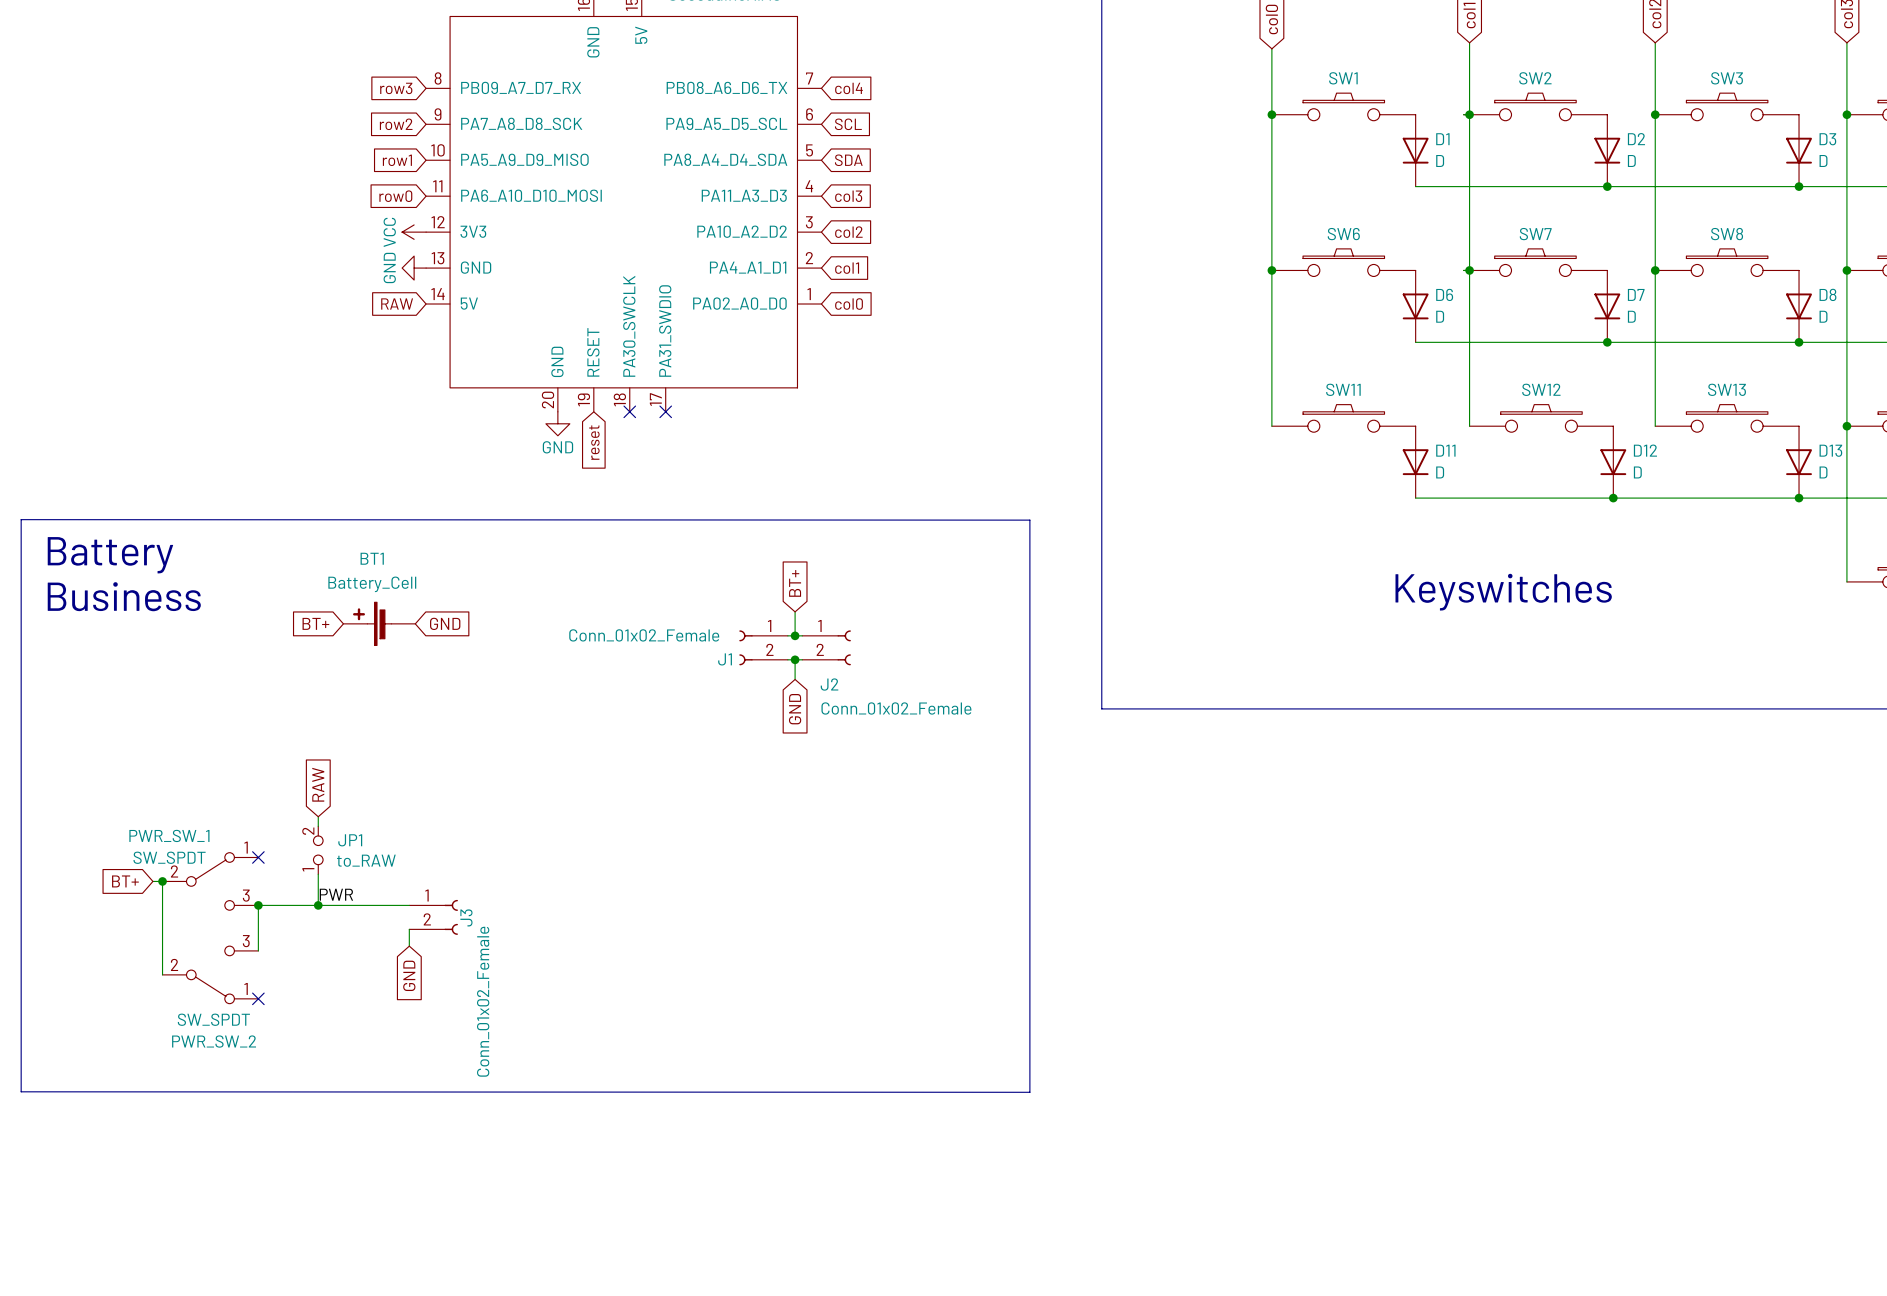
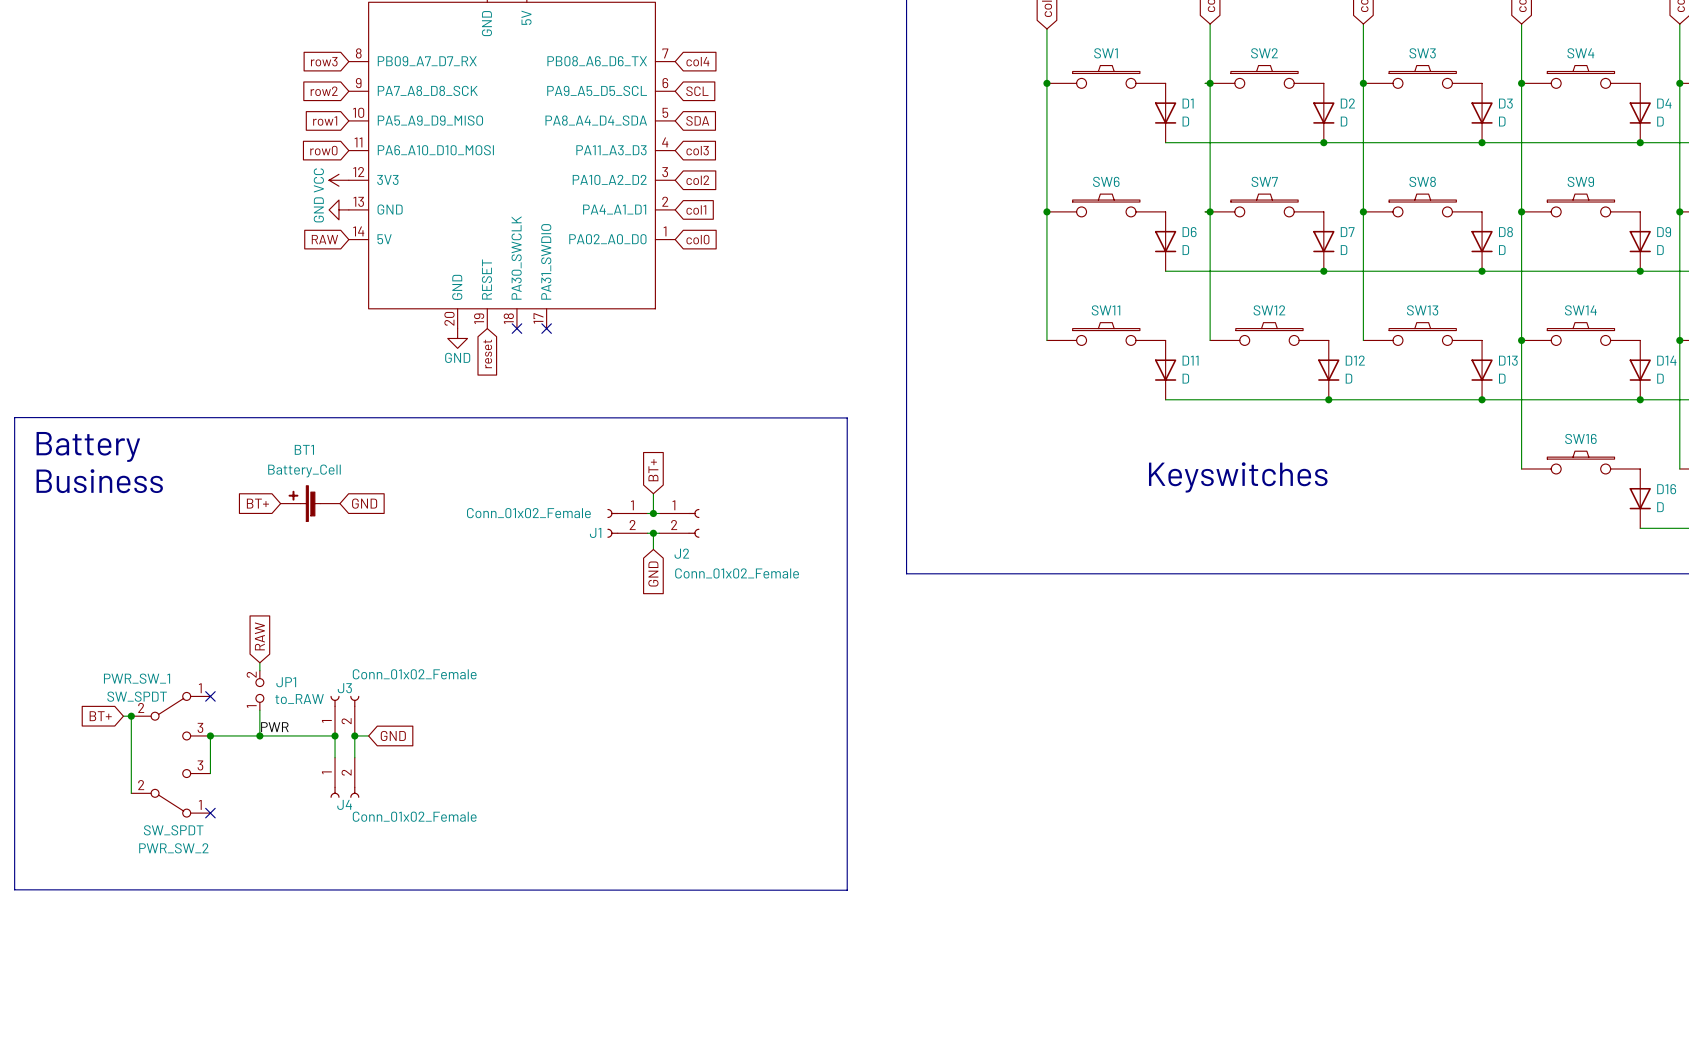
wire: none -> (335, 735) (335, 755)
junction: none -> (335, 735)
junction: none -> (354, 735)
wire: none -> (368, 735) (354, 735) (354, 757)
J3 position: (433, 917) -> (344, 715)
J3 rotation: 0° (451, 917) -> 90° counterclockwise (344, 701)
J4: none -> Conn_01x02_Female (344, 777)
global label rotation: 0° (409, 975) -> 90° counterclockwise (393, 735)
global label position: GND (409, 975) -> GND (393, 735)

